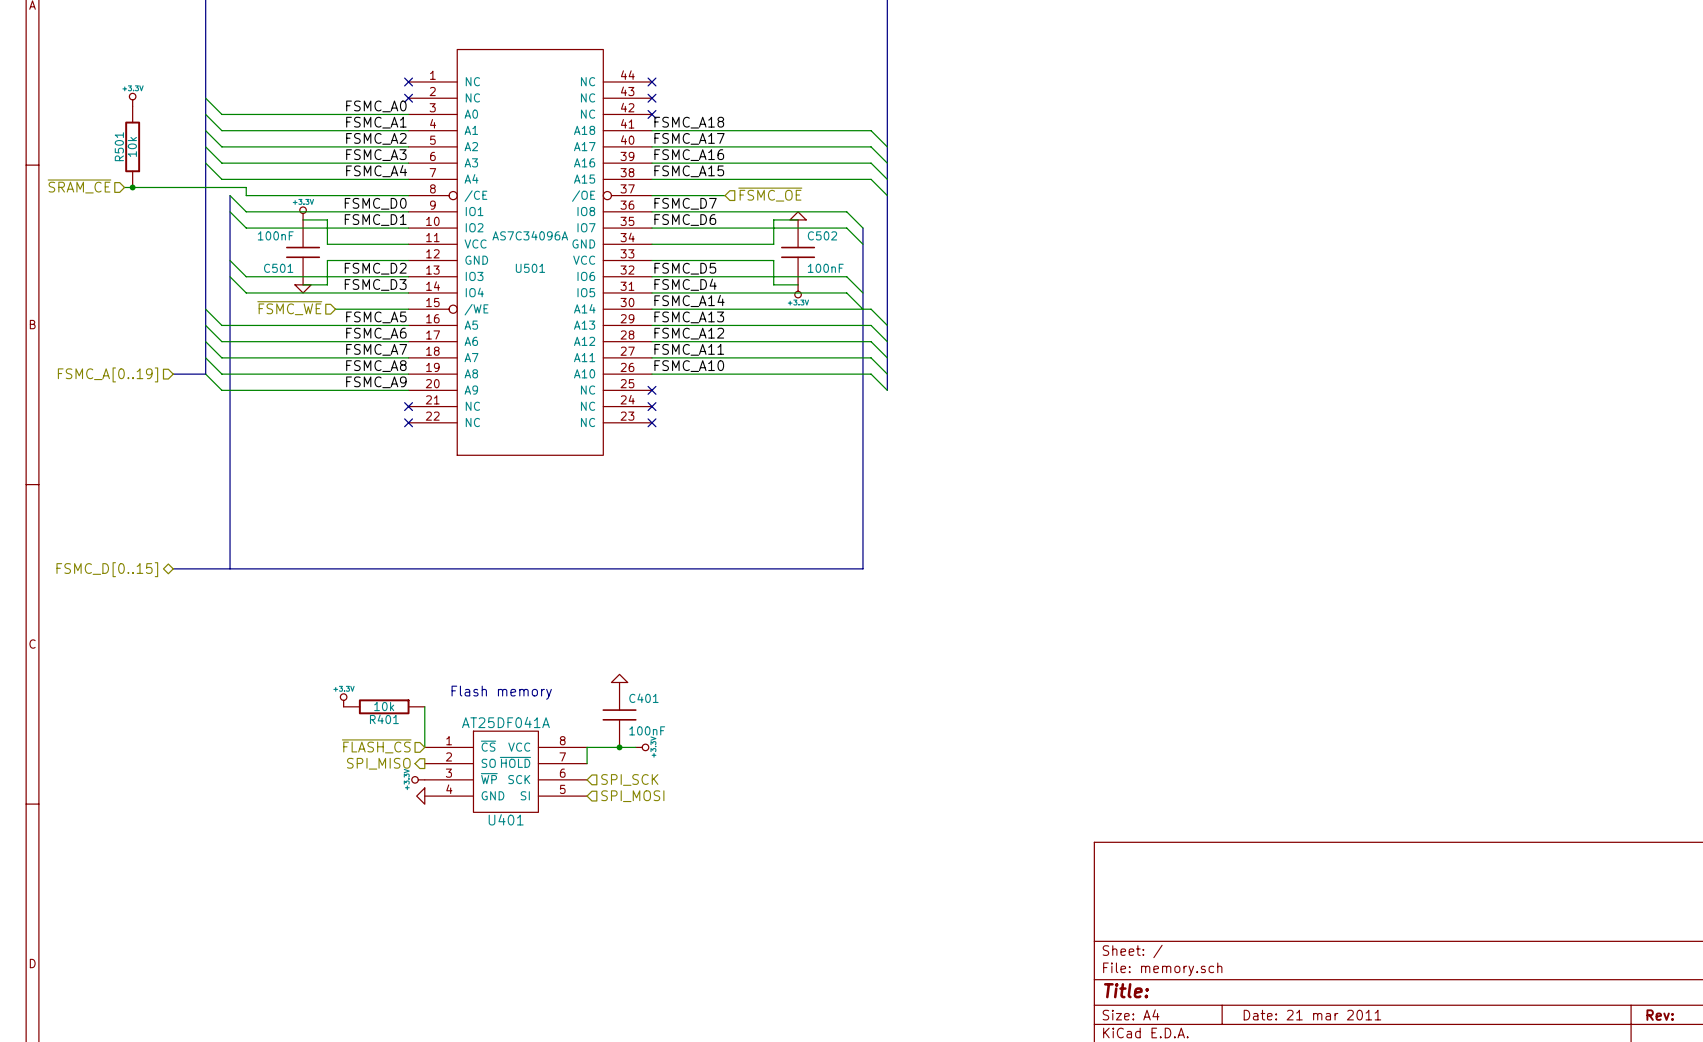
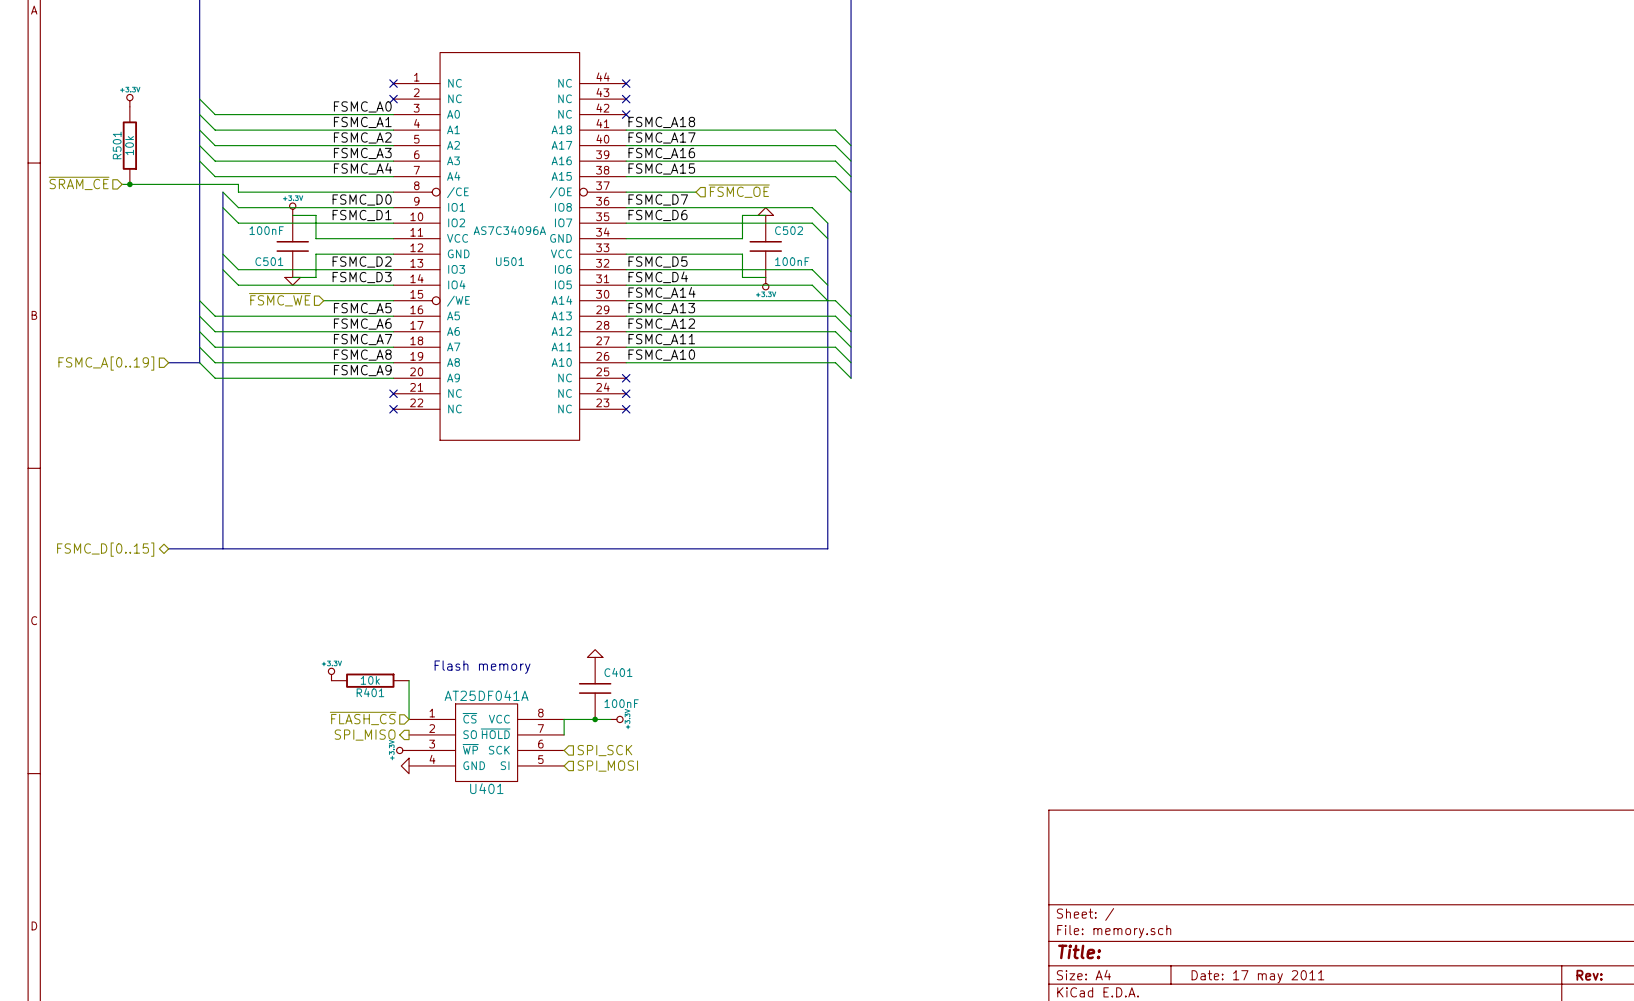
title block: Date: 21 mar 2011 (1312, 1015) -> Date: 17 may 2011 (1257, 976)

